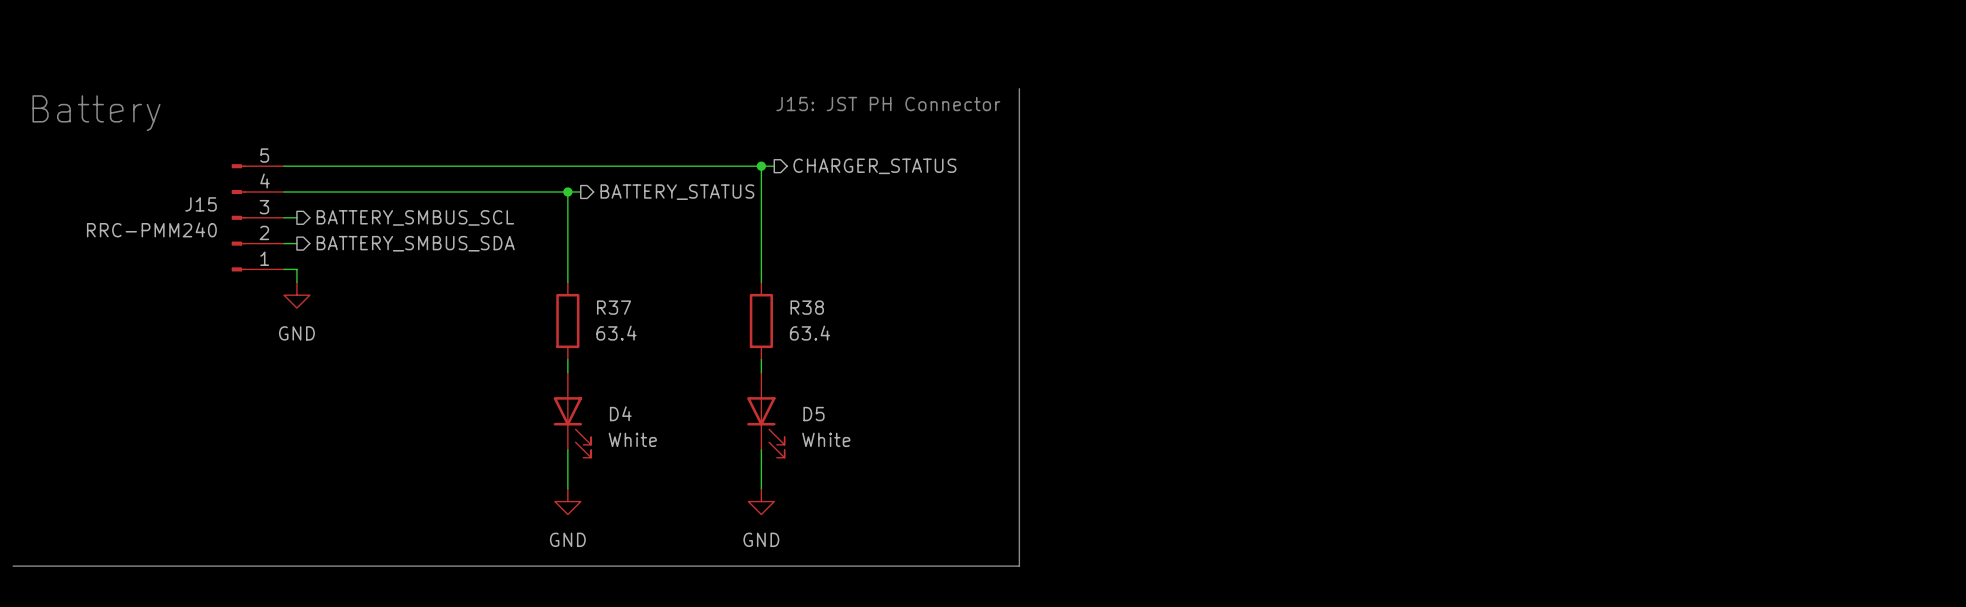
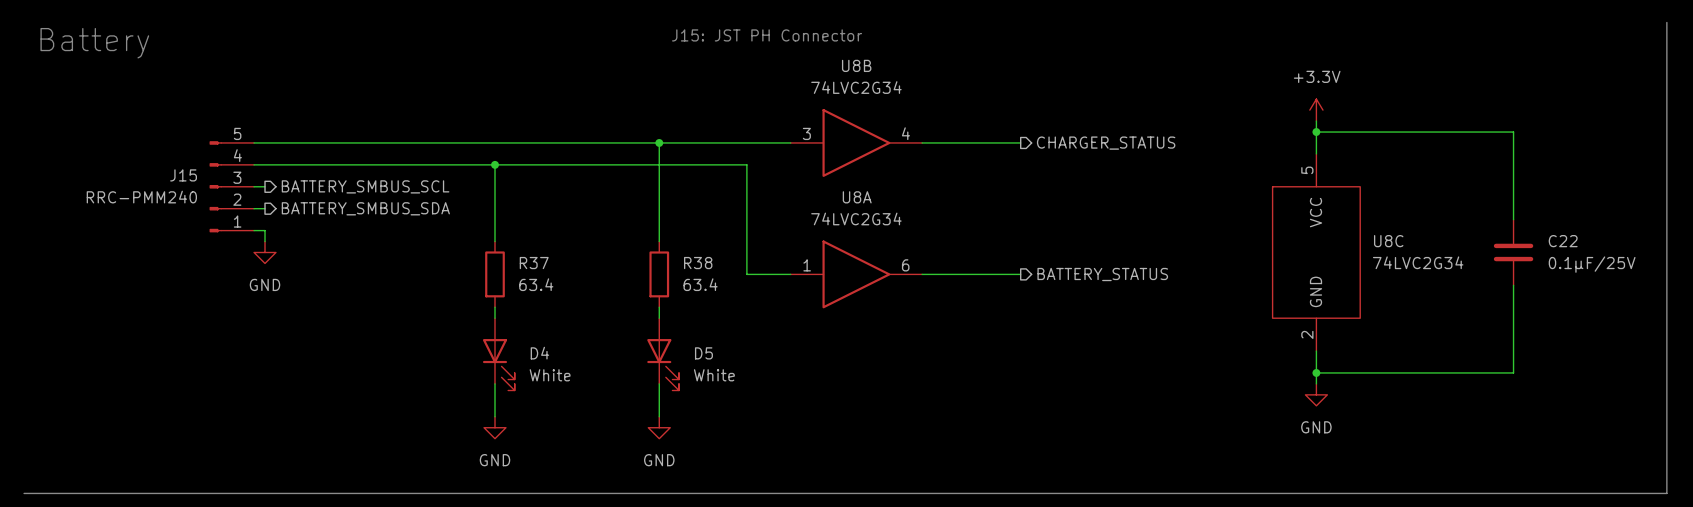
line: none -> (1666, 22) (1666, 493) (24, 493)
line: (1019, 88) (1019, 566) (13, 566) -> none
text position: J15: JST PH Connector (888, 104) -> J15: JST PH Connector (767, 35)
text position: Battery (96, 113) -> Battery (94, 43)
power symbol: none -> +3.3V (1316, 110)
wire: none -> (1316, 121) (1316, 153)
wire: none -> (1316, 132) (1513, 132) (1513, 219)
junction: none -> (1316, 132)
wire: none -> (670, 142) (790, 142)
hierarchical label: CHARGER_STATUS (874, 166) -> none
U8B: none -> 74LVC2G34 (856, 142)
wire: none -> (922, 142) (1020, 142)
hierarchical label: none -> CHARGER_STATUS (1106, 143)
wire: none -> (505, 164) (746, 164) (746, 274) (790, 274)
hierarchical label: BATTERY_STATUS (677, 192) -> none
U8C: none -> 74LVC2G34 (1316, 252)
C22: none -> 0.1µF/25V (1513, 252)
U8A: none -> 74LVC2G34 (856, 274)
wire: none -> (922, 274) (1020, 274)
hierarchical label: none -> BATTERY_STATUS (1102, 274)
wire: none -> (1513, 285) (1513, 372) (1316, 372)
wire: none -> (1316, 351) (1316, 383)
junction: none -> (1316, 372)
power symbol: none -> GND (1316, 394)

